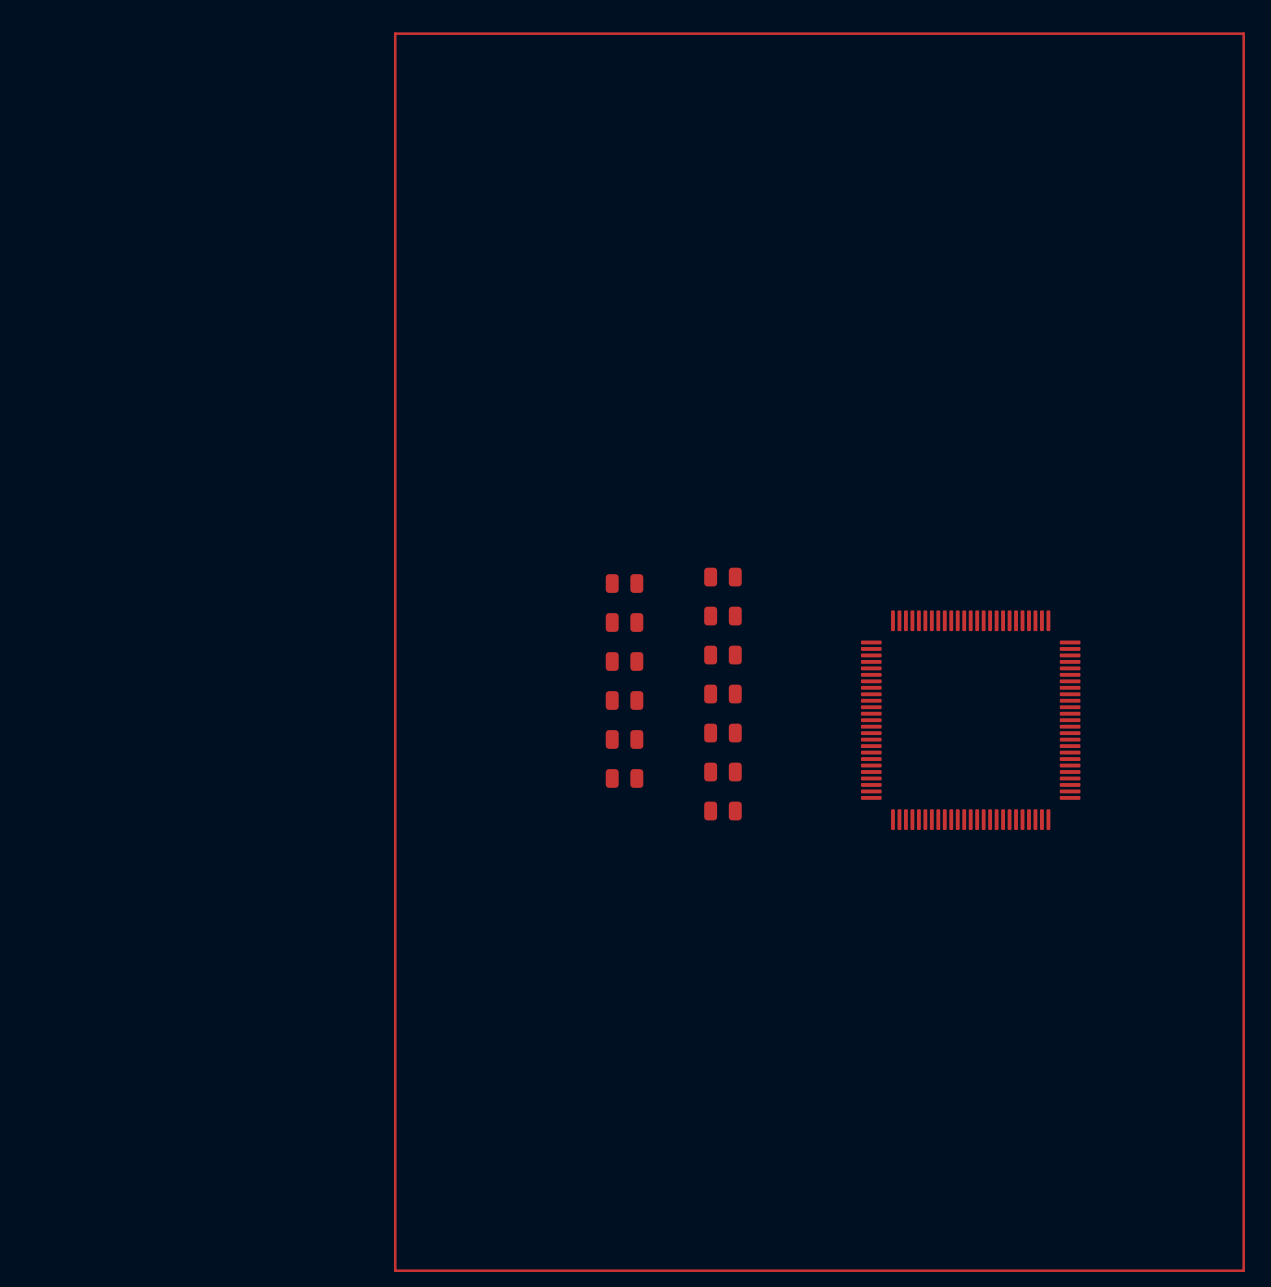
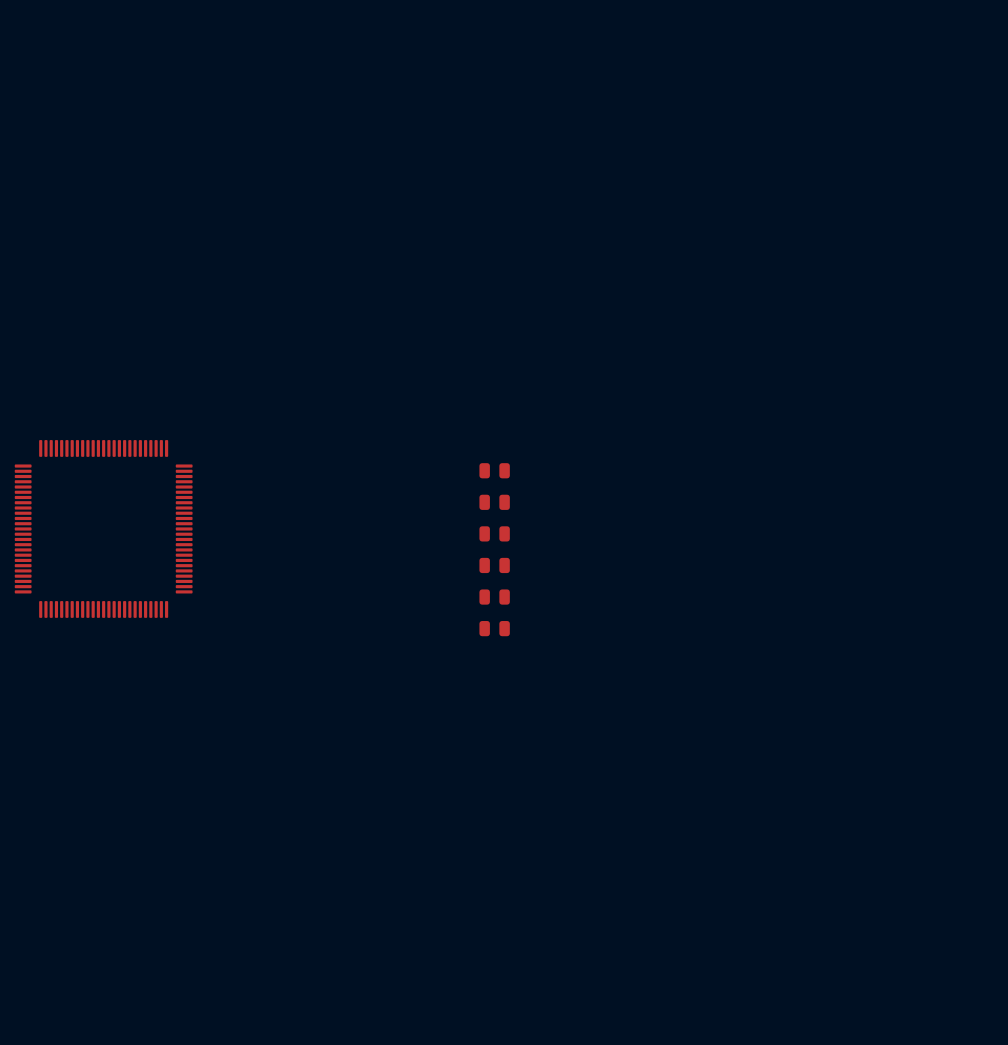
top track: (1243, 33) (395, 33) (395, 1270) (1243, 1270) (1243, 33) -> none
part: (722, 577) -> none
part: (722, 616) -> none
part: none -> (103, 528)
part: (722, 655) -> none
part: (722, 694) -> none
part: (970, 720) -> none
part: (722, 733) -> none
part: (722, 772) -> none
part: (722, 810) -> none

